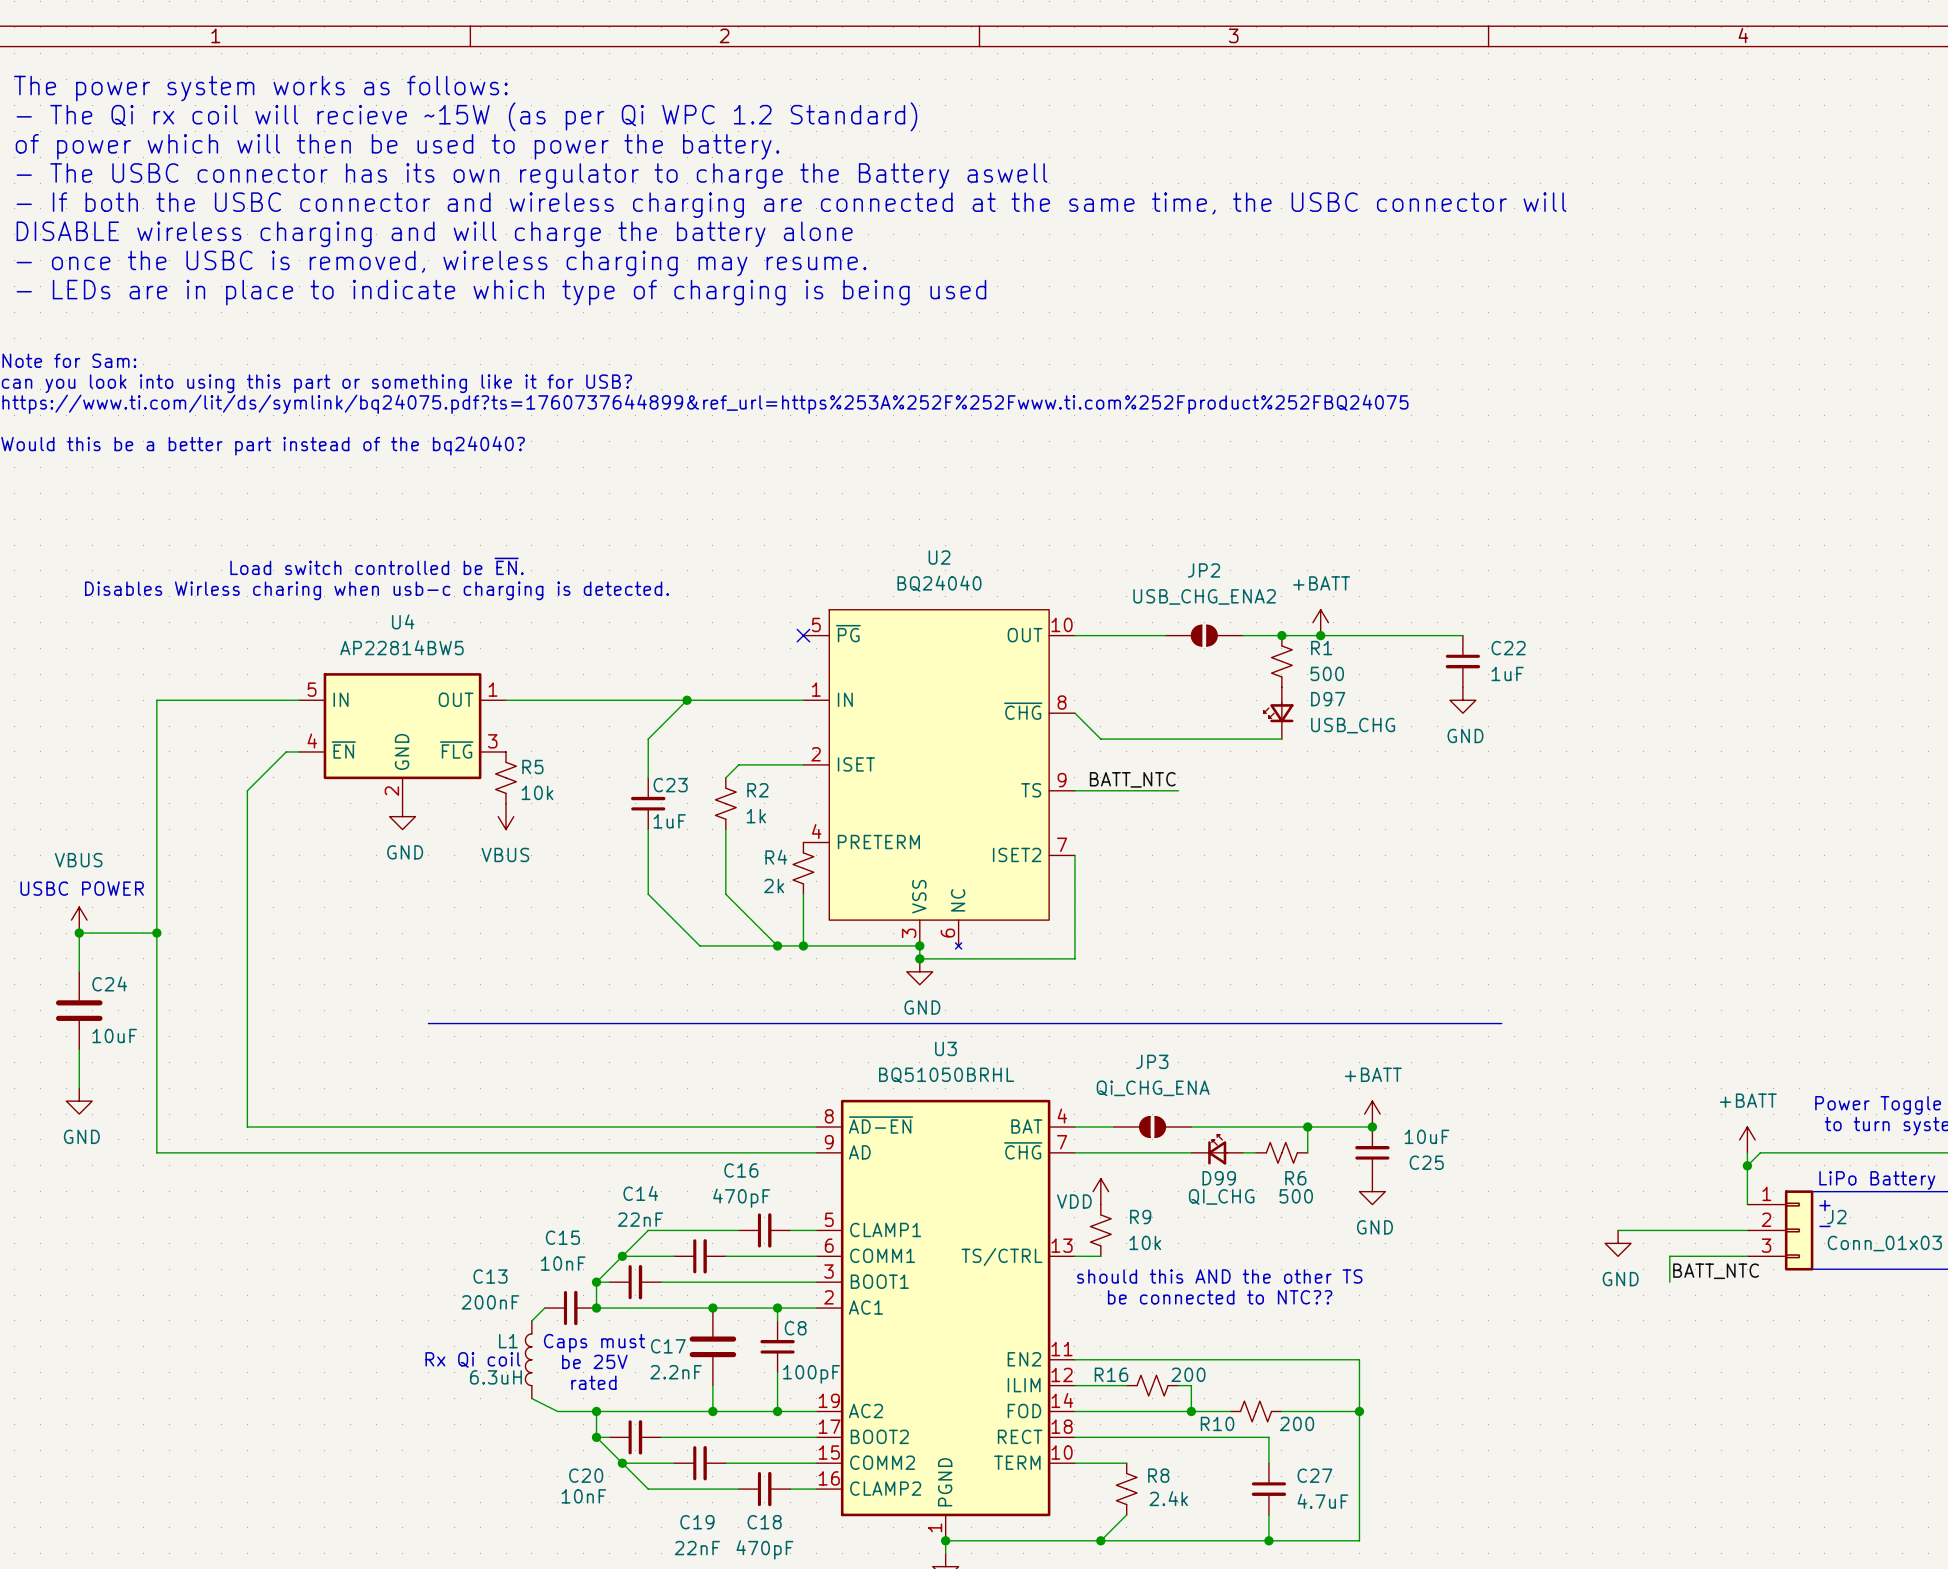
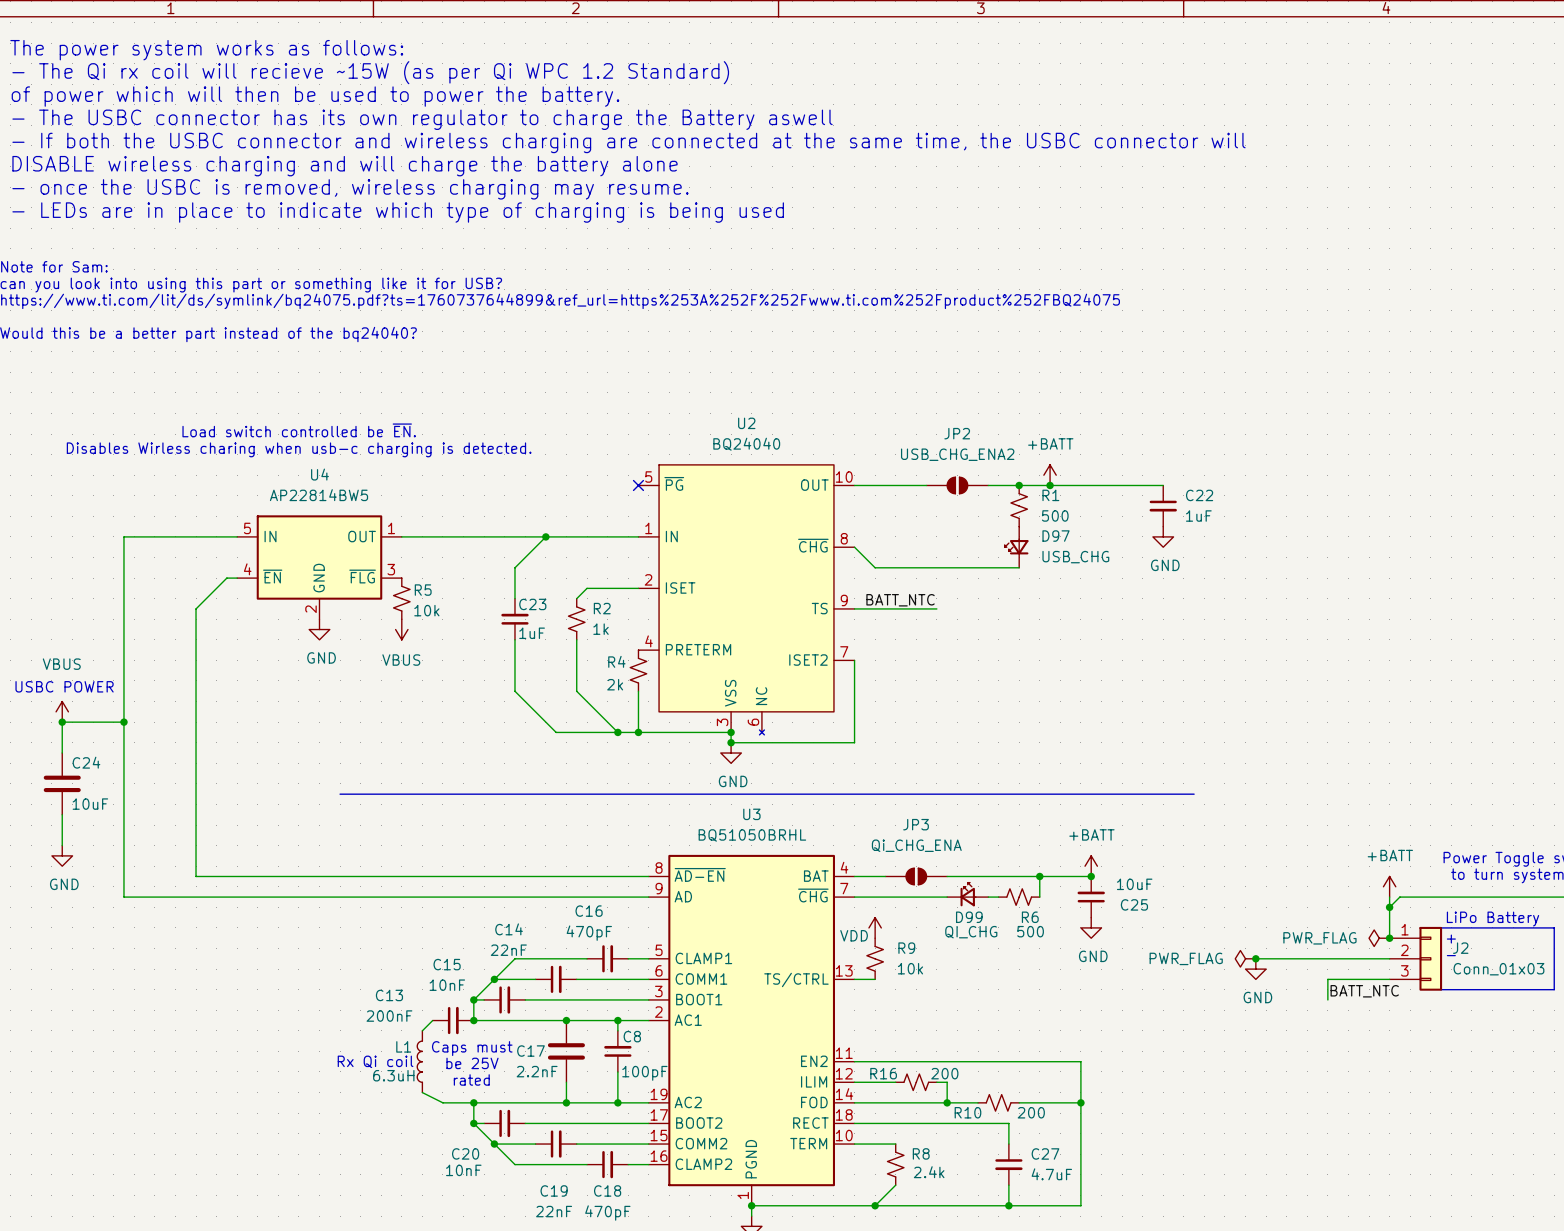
power symbol: none -> PWR_FLAG (1379, 938)
junction: none -> (1389, 938)
power symbol: none -> PWR_FLAG (1245, 958)
wire: none -> (1255, 958) (1286, 958)
junction: none -> (1255, 958)
power symbol position: GND (1618, 1243) -> GND (1255, 969)
text: should this AND the other TS (1219, 1276) -> none
text: be connected to NTC?? (1220, 1297) -> none

